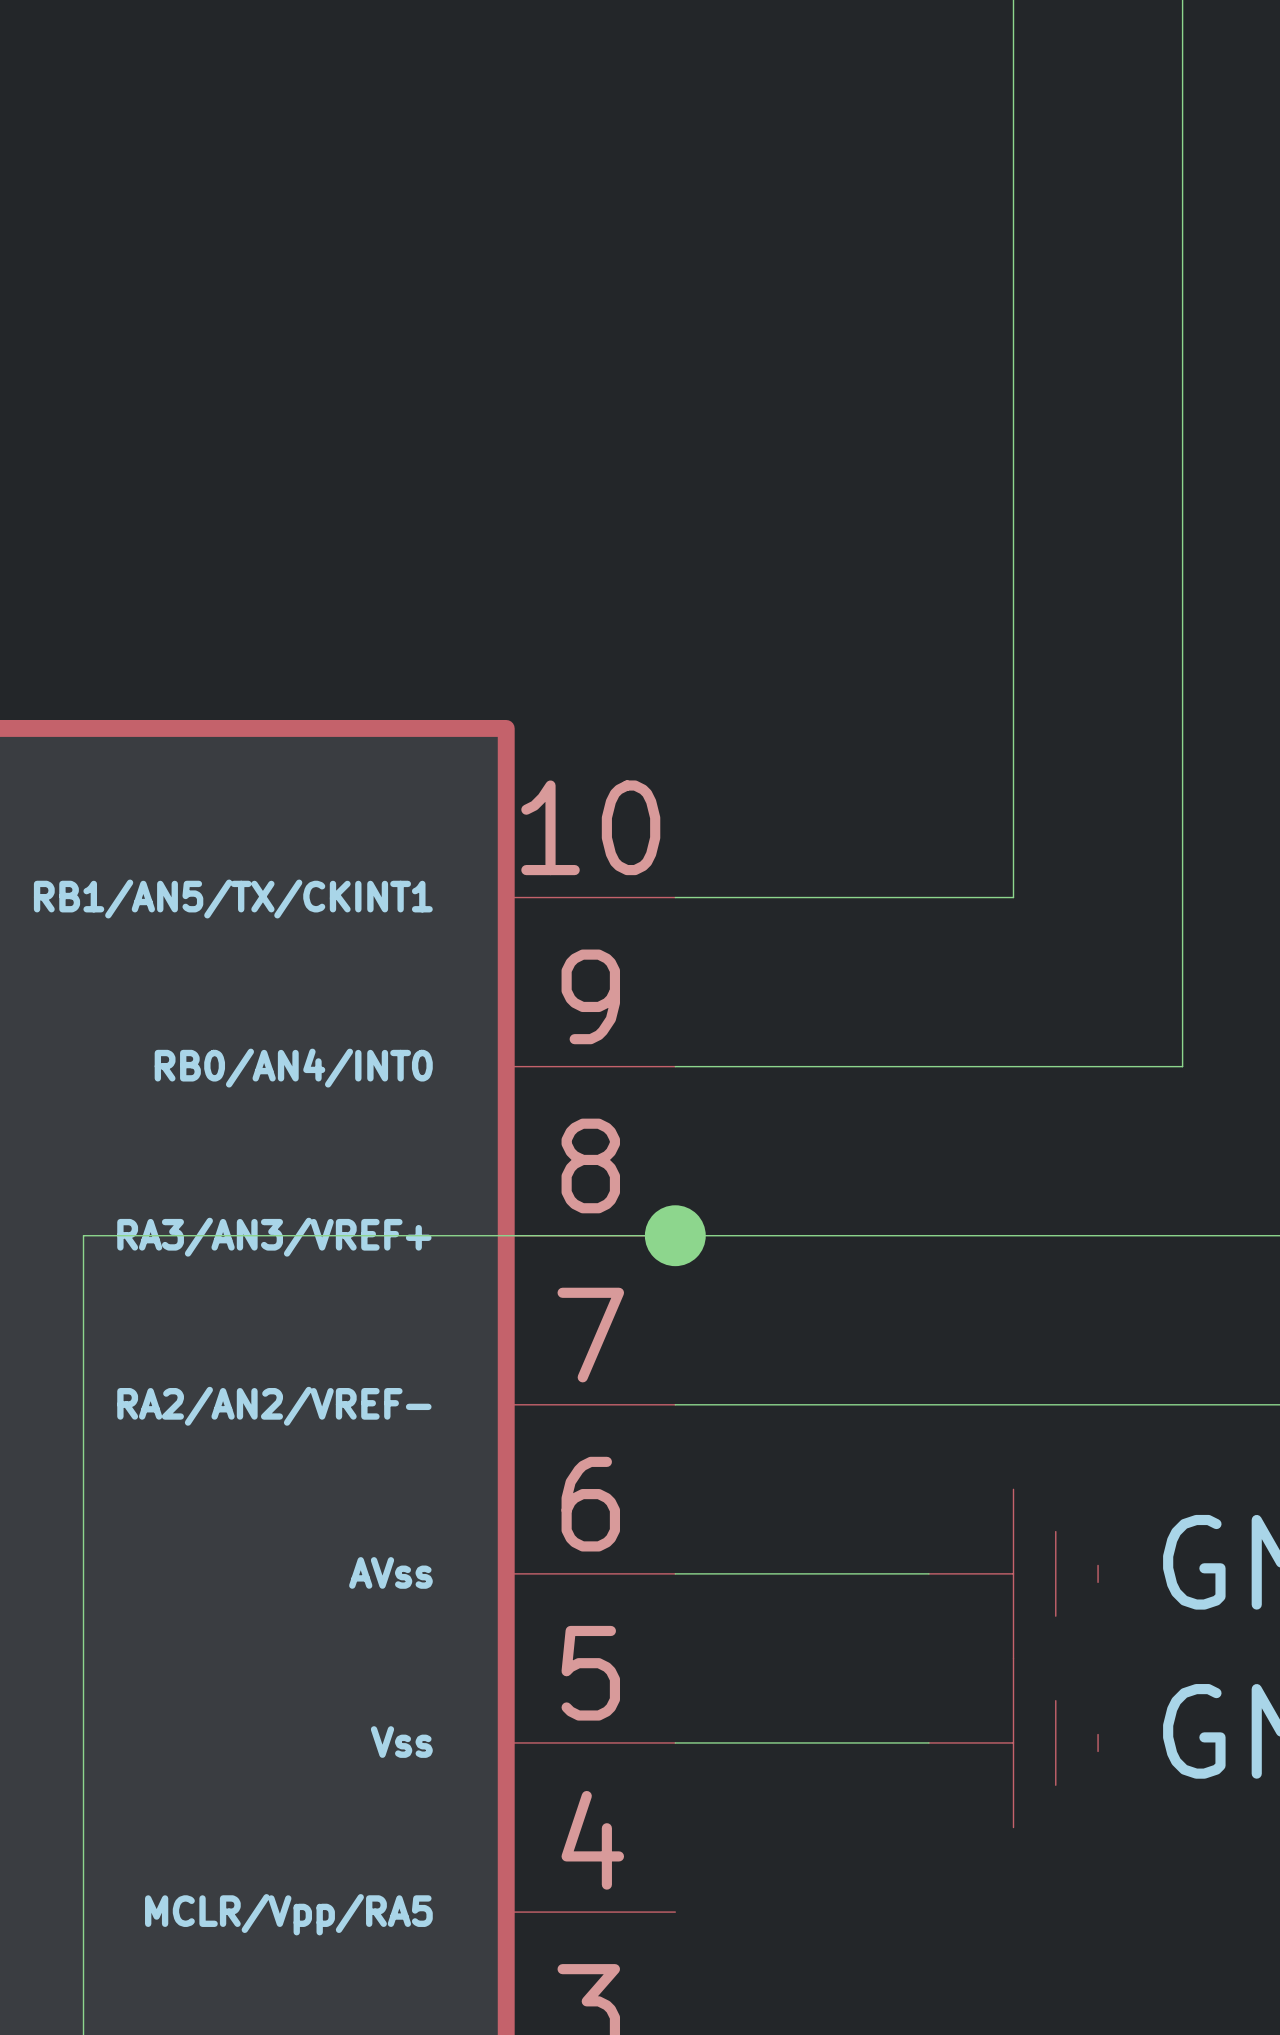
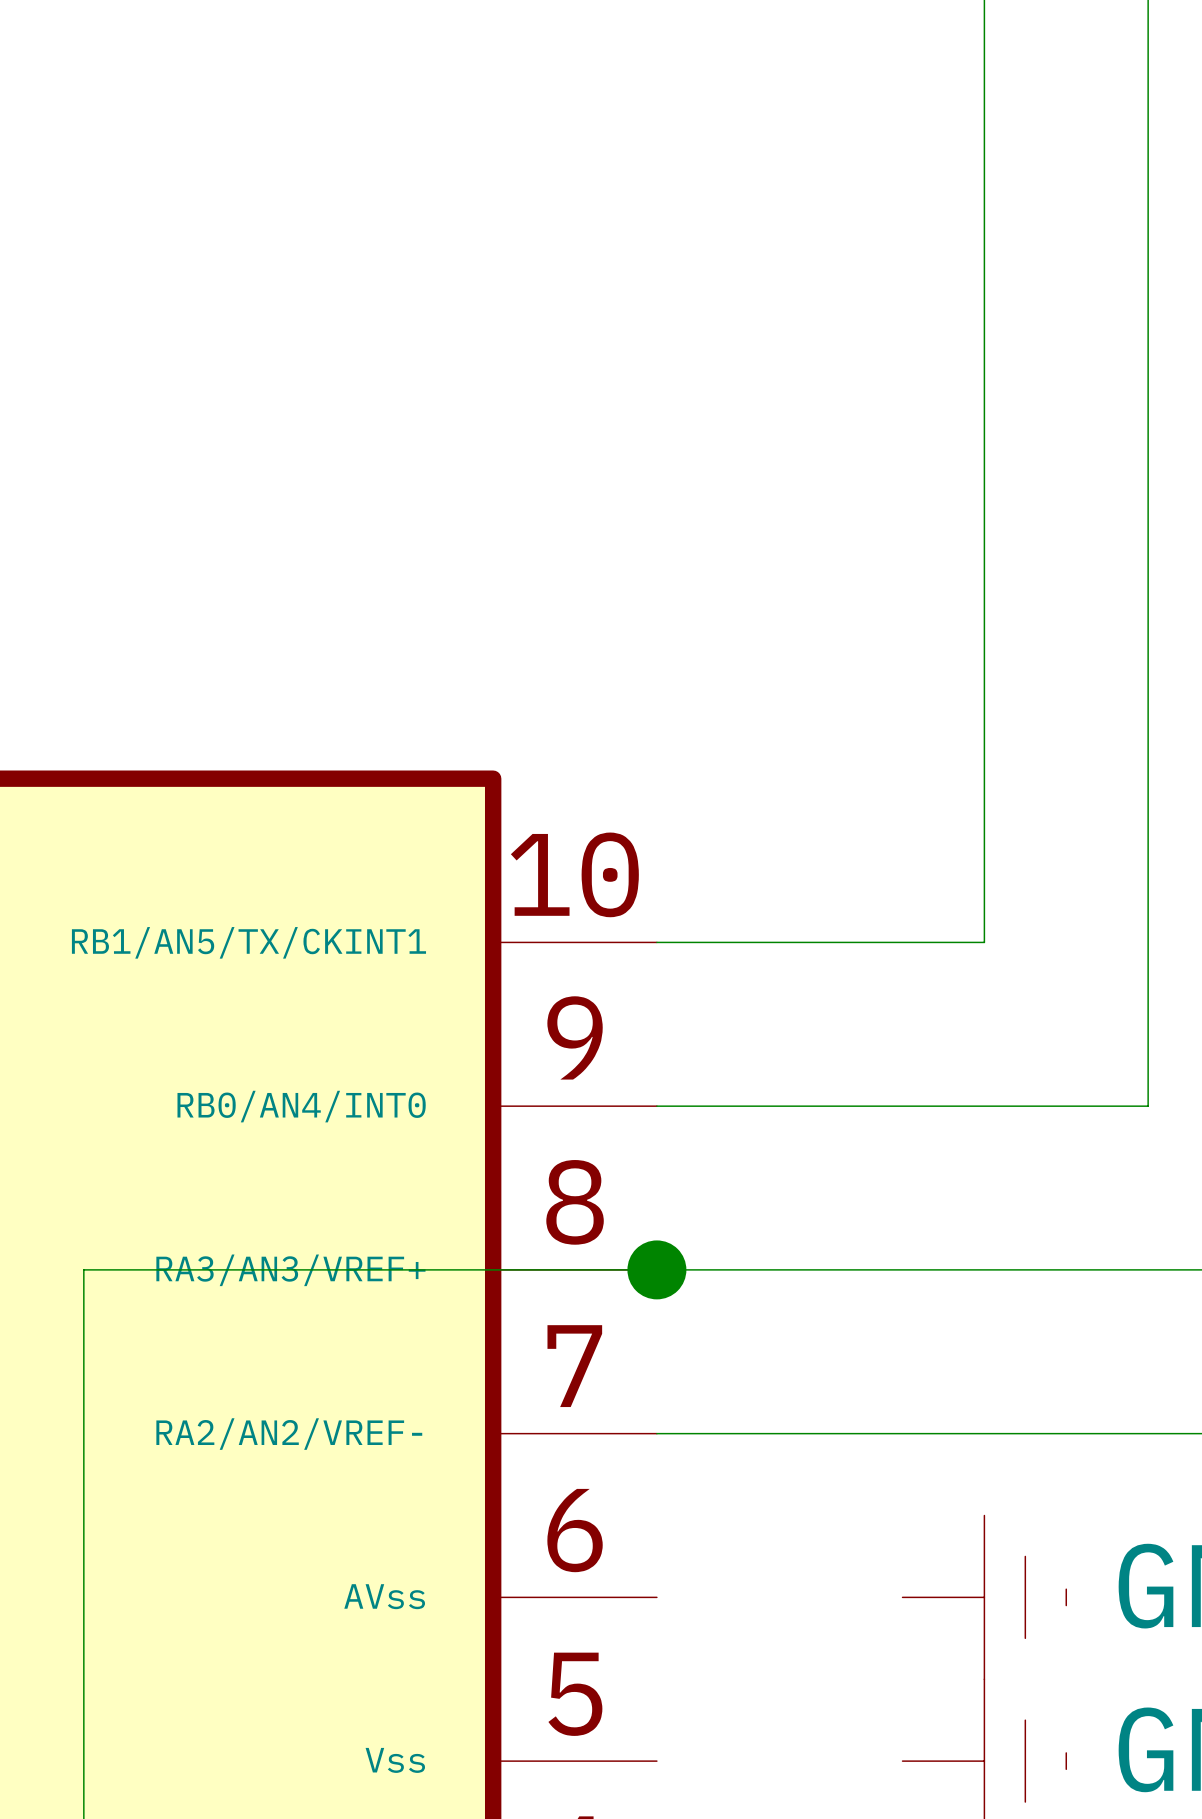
wire: (675, 1573) (928, 1573) -> none
wire: (675, 1742) (928, 1742) -> none

